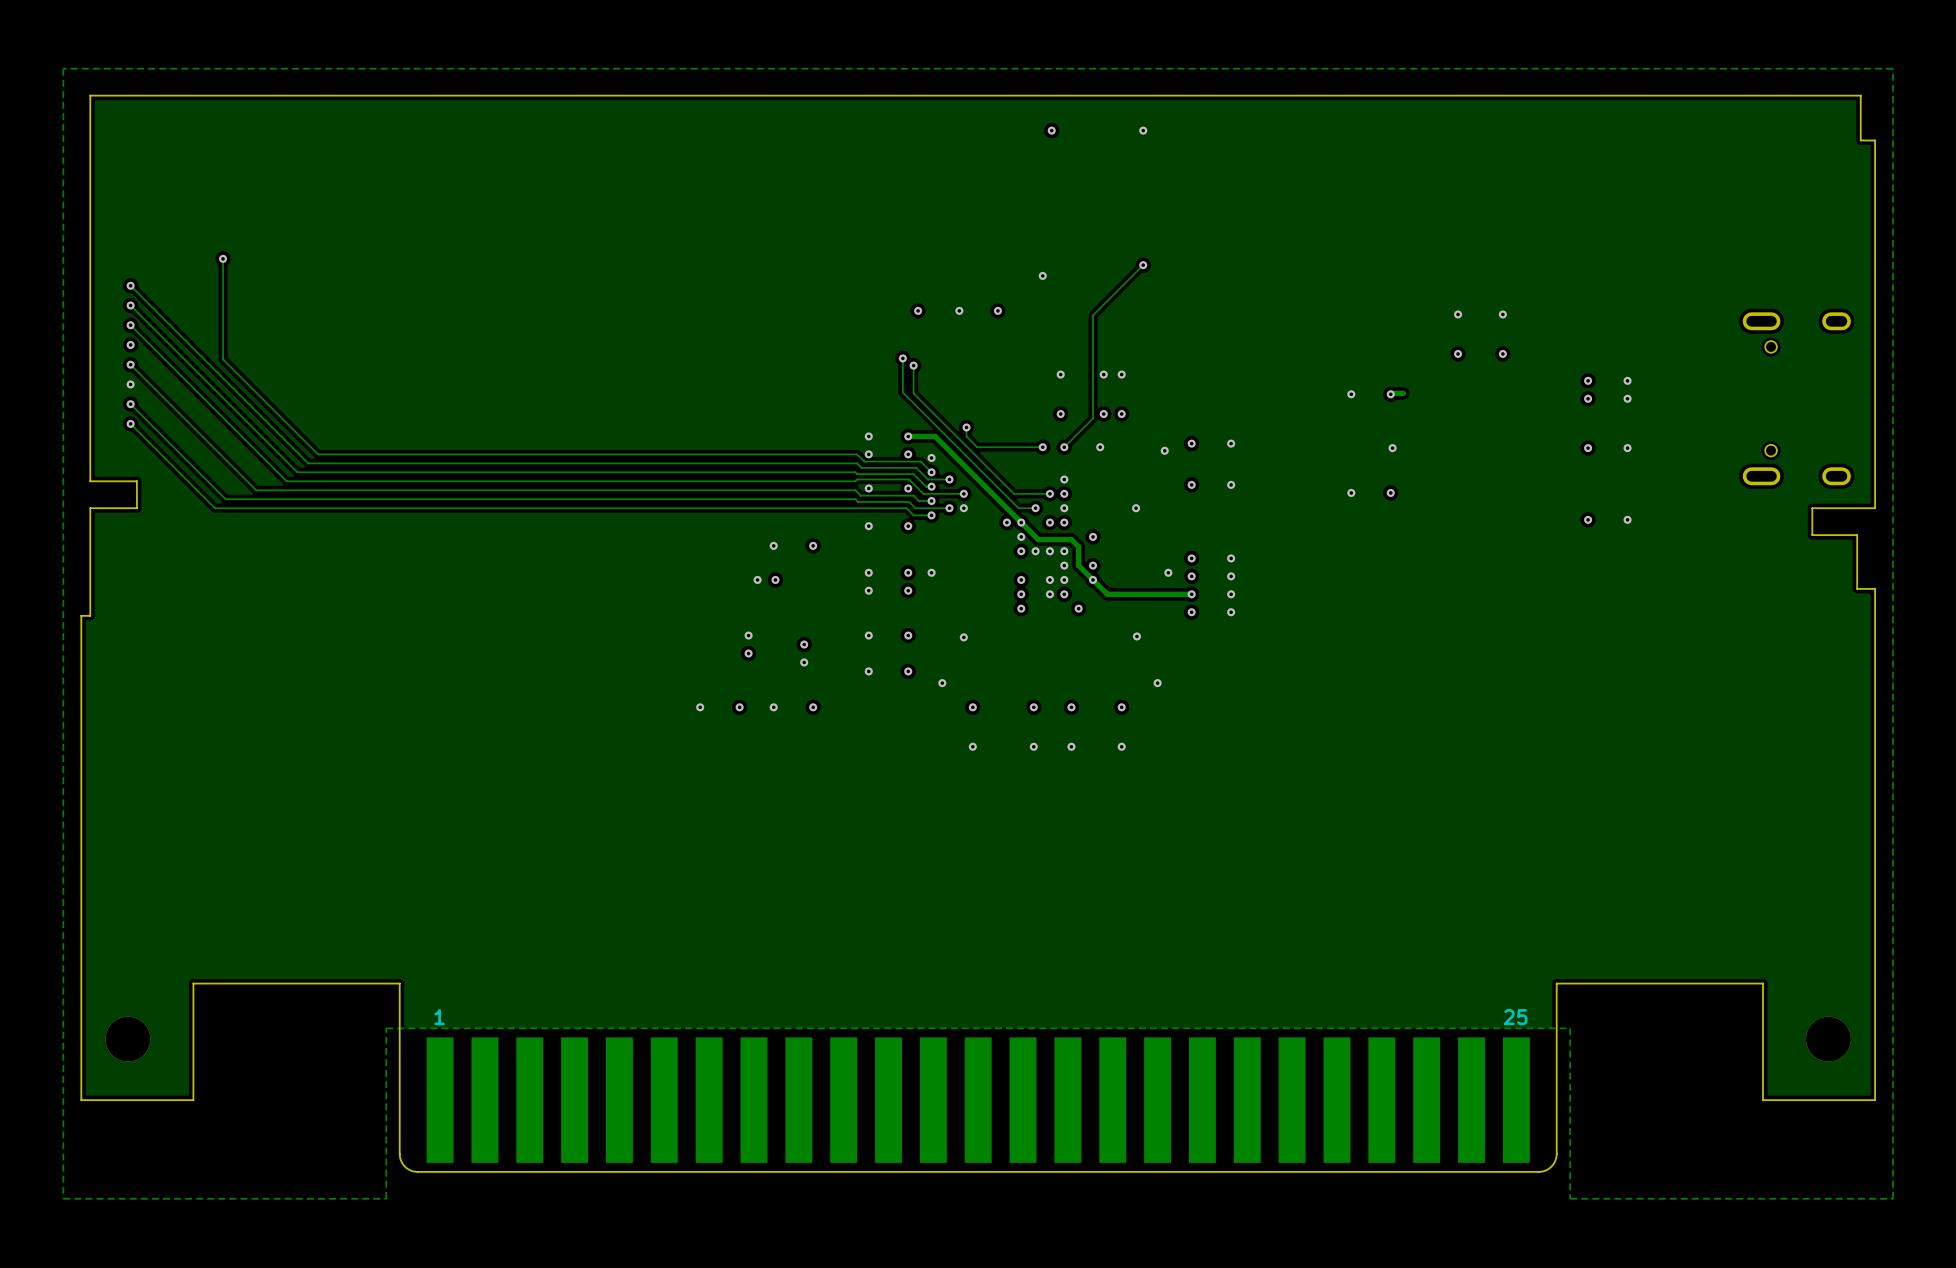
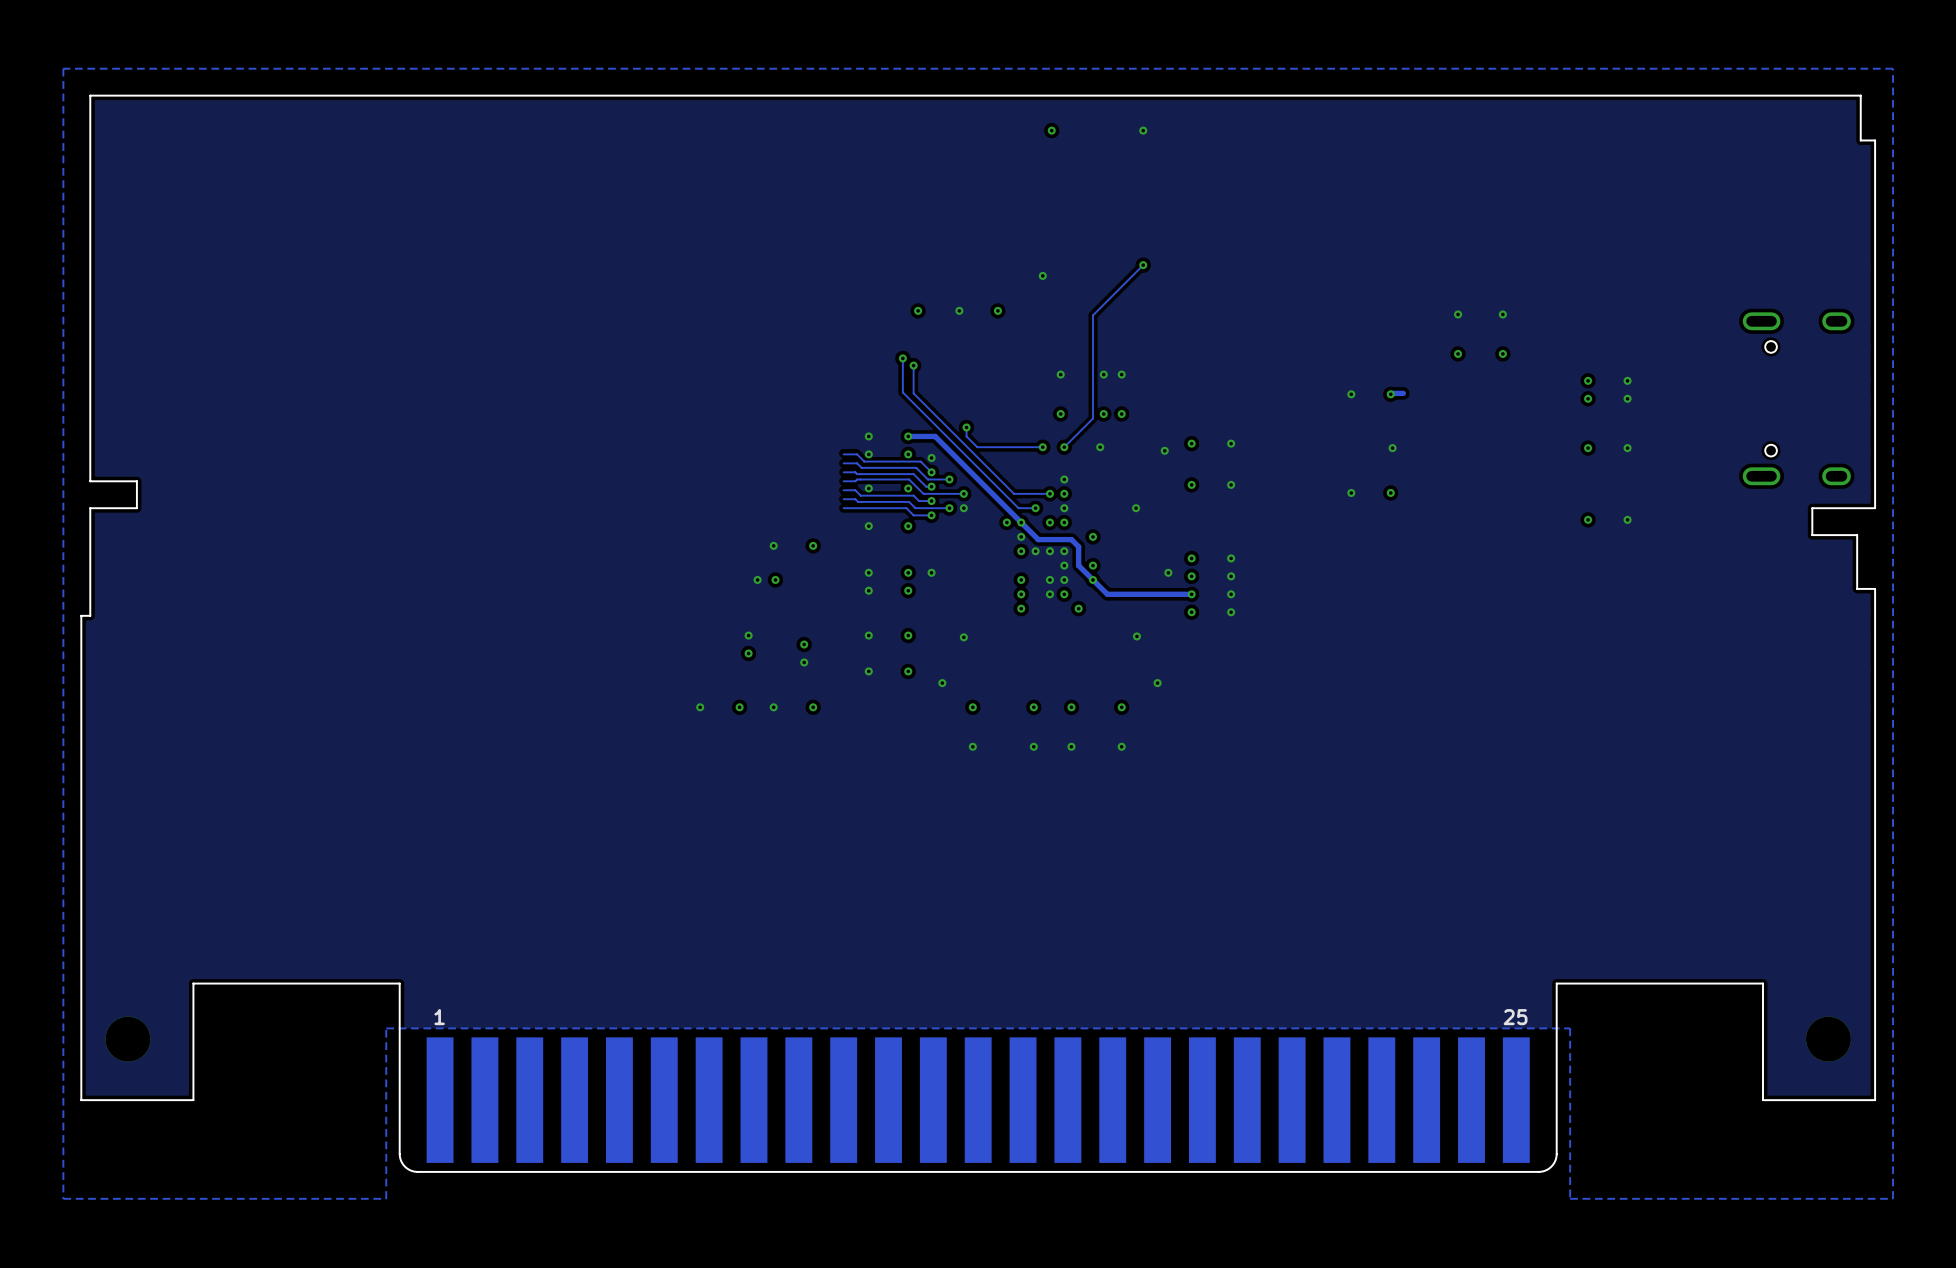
track: (223, 258) (223, 359) (318, 454) (843, 454) -> none
via: (223, 258) -> none
track: (130, 285) (308, 463) (843, 463) -> none
via: (130, 285) -> none
track: (130, 305) (297, 472) (843, 472) -> none
via: (130, 305) -> none
track: (130, 325) (286, 481) (843, 481) -> none
via: (130, 325) -> none
via: (130, 344) -> none
track: (130, 364) (256, 490) (843, 490) -> none
via: (130, 364) -> none
via: (130, 384) -> none
track: (130, 404) (225, 499) (843, 499) -> none
via: (130, 404) -> none
track: (130, 423) (214, 508) (843, 508) -> none
via: (130, 423) -> none

